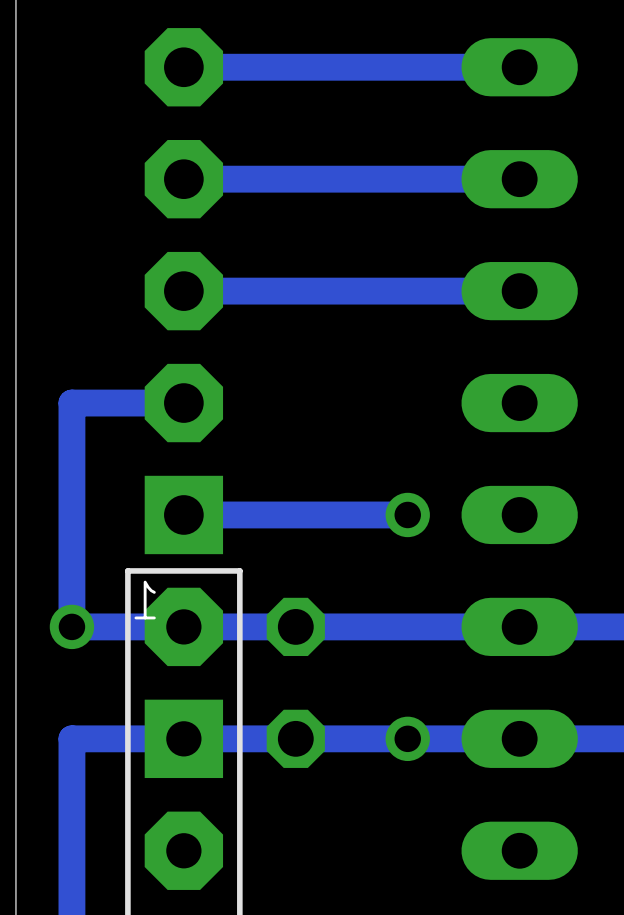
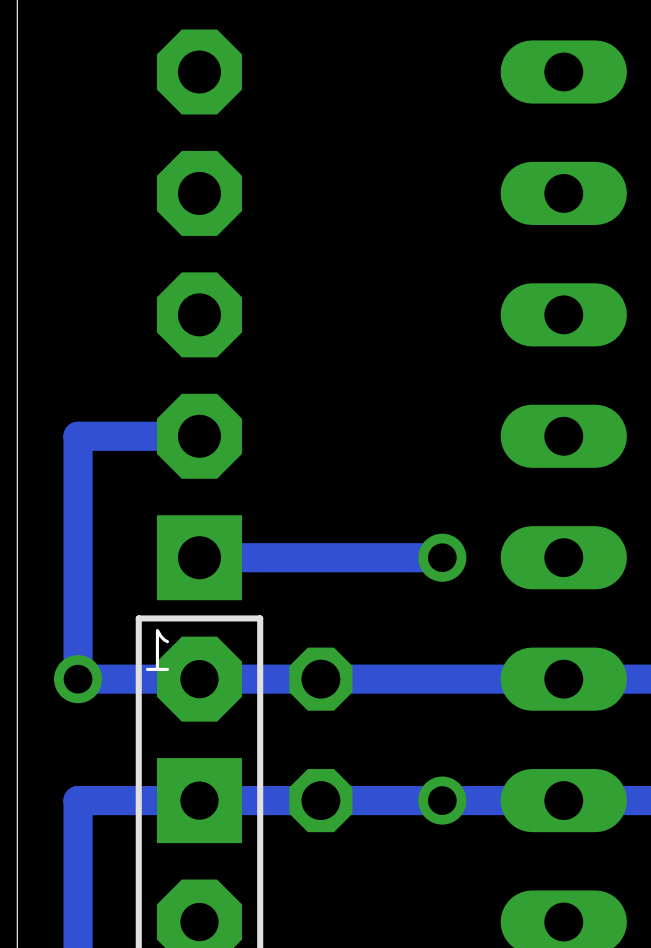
track: (519, 67) (183, 67) -> none
track: (519, 179) (183, 179) -> none
track: (519, 291) (183, 291) -> none

